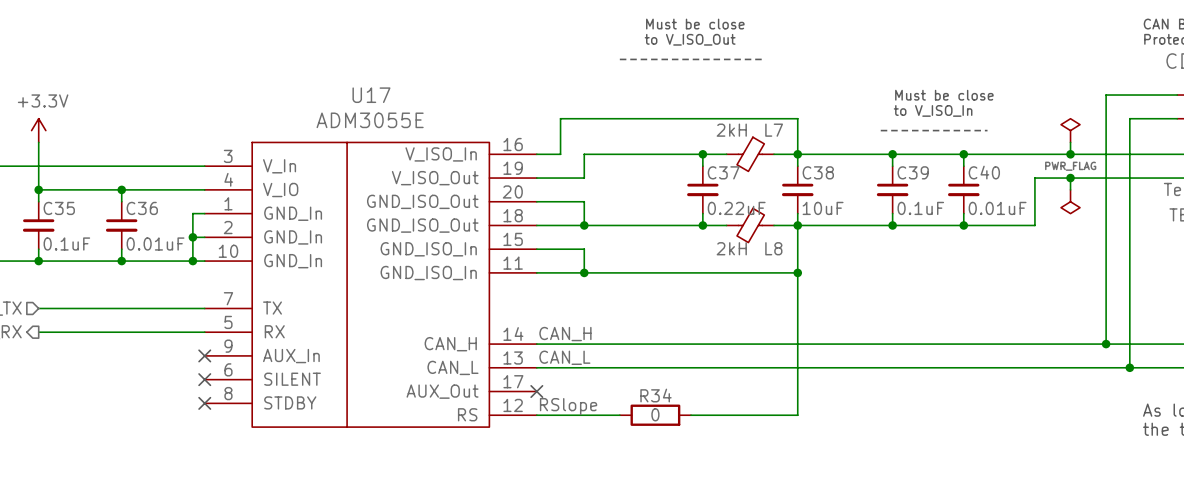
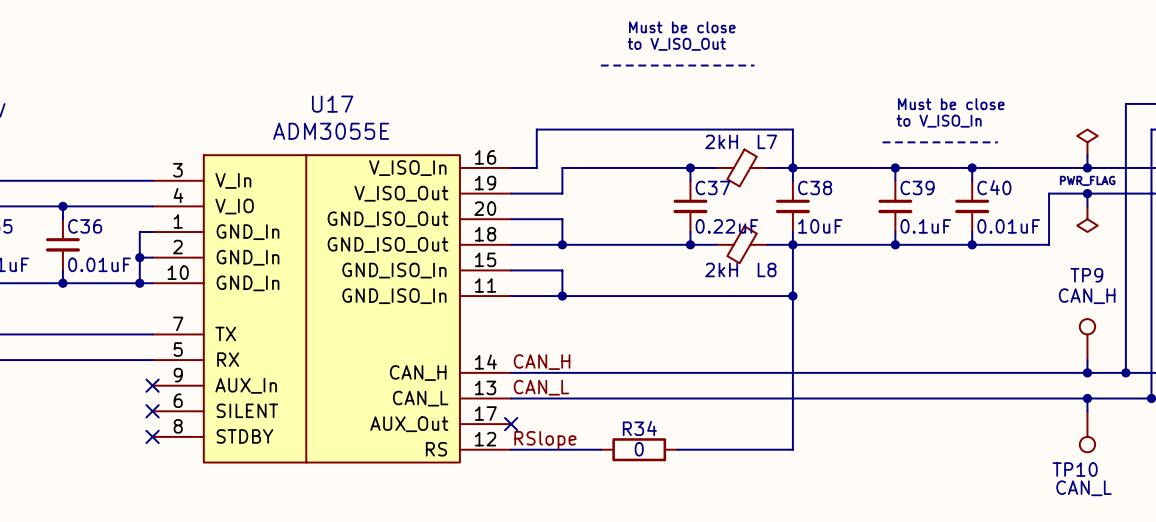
TP9: none -> CAN_H (1087, 339)
wire: none -> (1087, 360) (1087, 372)
junction: none -> (1087, 372)
wire: none -> (1087, 398) (1087, 411)
junction: none -> (1087, 398)
TP10: none -> CAN_L (1087, 431)

